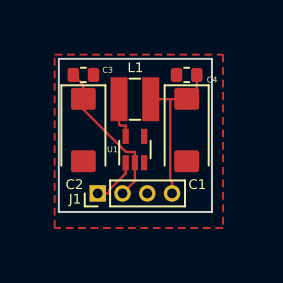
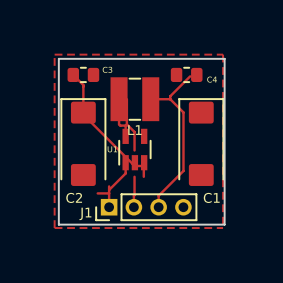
board edge: (211, 58) (211, 211) (58, 211) -> (211, 58) (224, 58) (224, 224) (58, 224) (58, 211)
L1 name position: L1 (135, 67) -> L1 (134, 130)
track: (196, 74) (196, 88) (186, 99) (170, 99) (170, 180) (172, 181) (172, 193) -> none
track: none -> (190, 76) (170, 96) (170, 99) (183, 112) (183, 170) (158, 195) (158, 207)
track: none -> (126, 99) (126, 124) (134, 132) (134, 150)
track: (83, 109) (125, 151) (134, 151) (134, 181) (122, 193) -> (83, 109) (83, 114) (134, 166) (143, 166) (143, 176)
C2 position: (83, 128) -> (83, 142)
C1 position: (186, 128) -> (201, 142)
track: none -> (134, 176) (133, 207)
J1 position: (134, 193) -> (146, 207)

